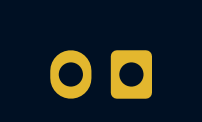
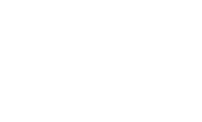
part: (101, 74) -> none

